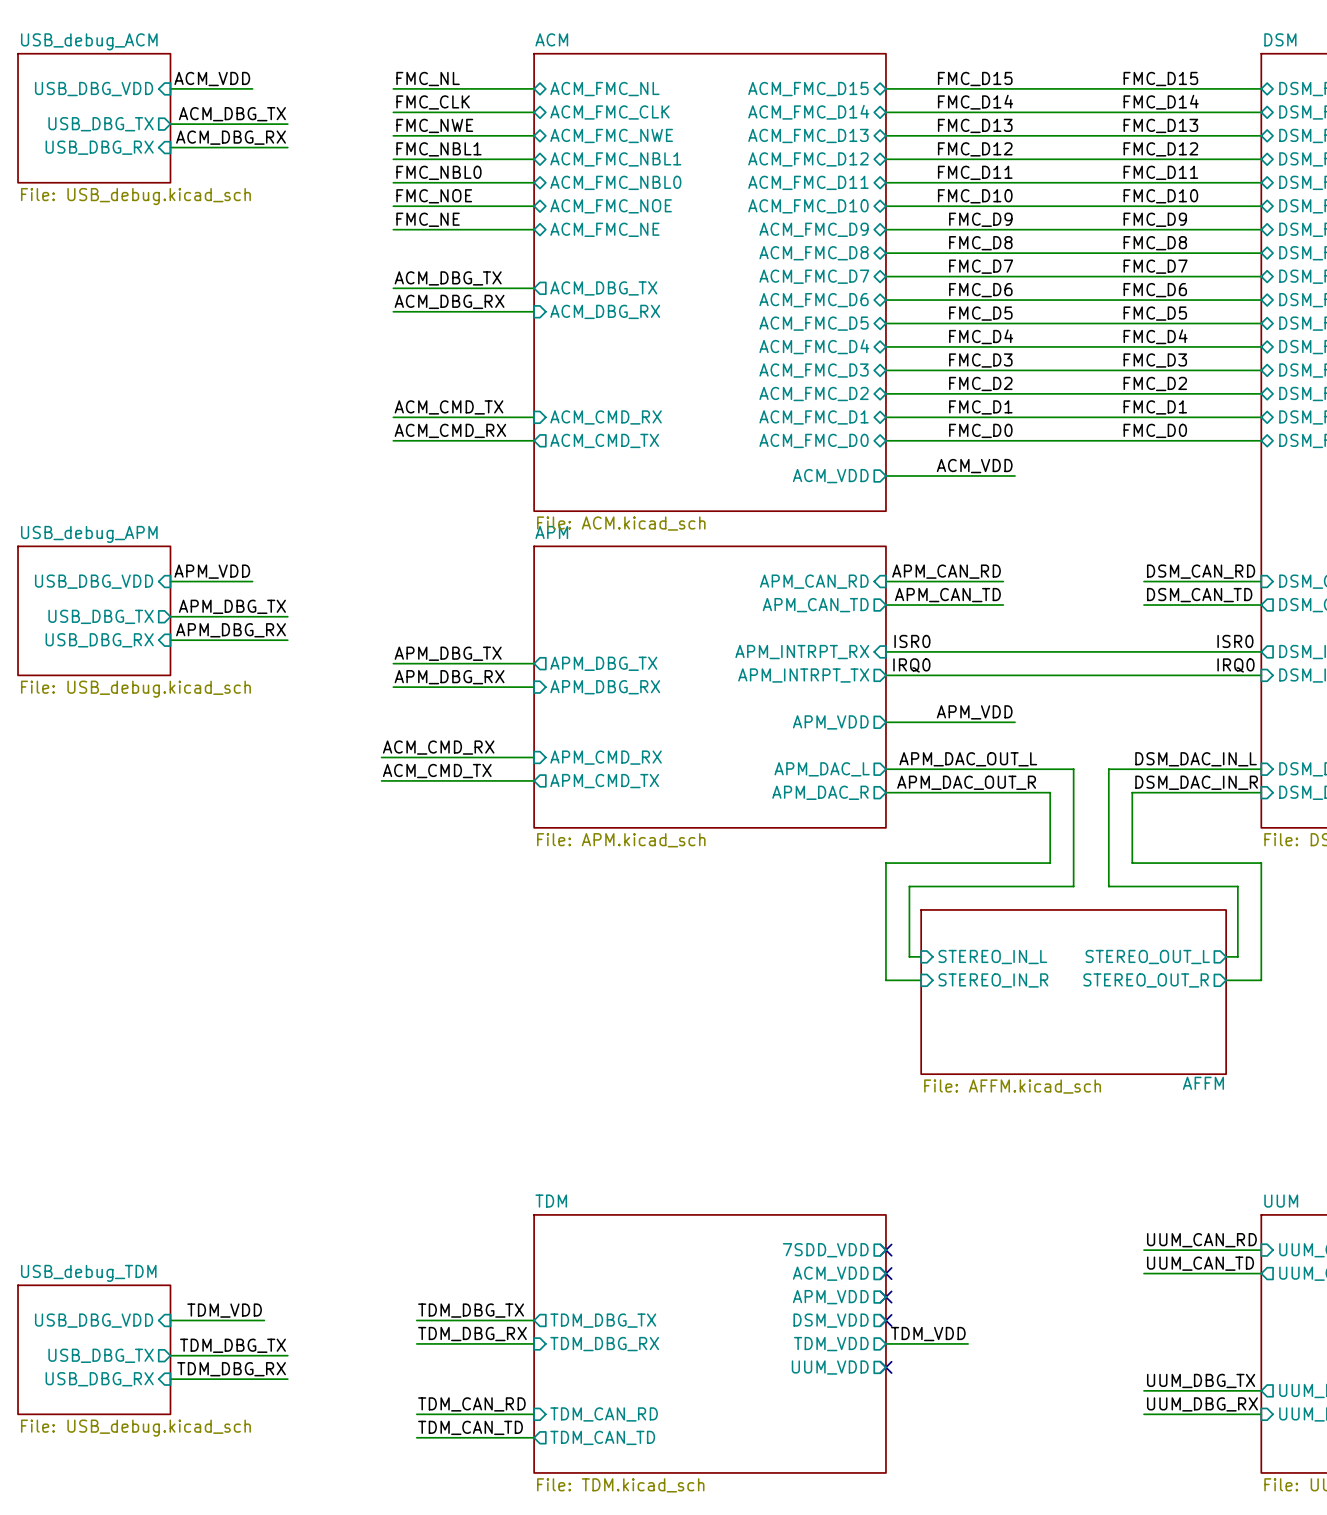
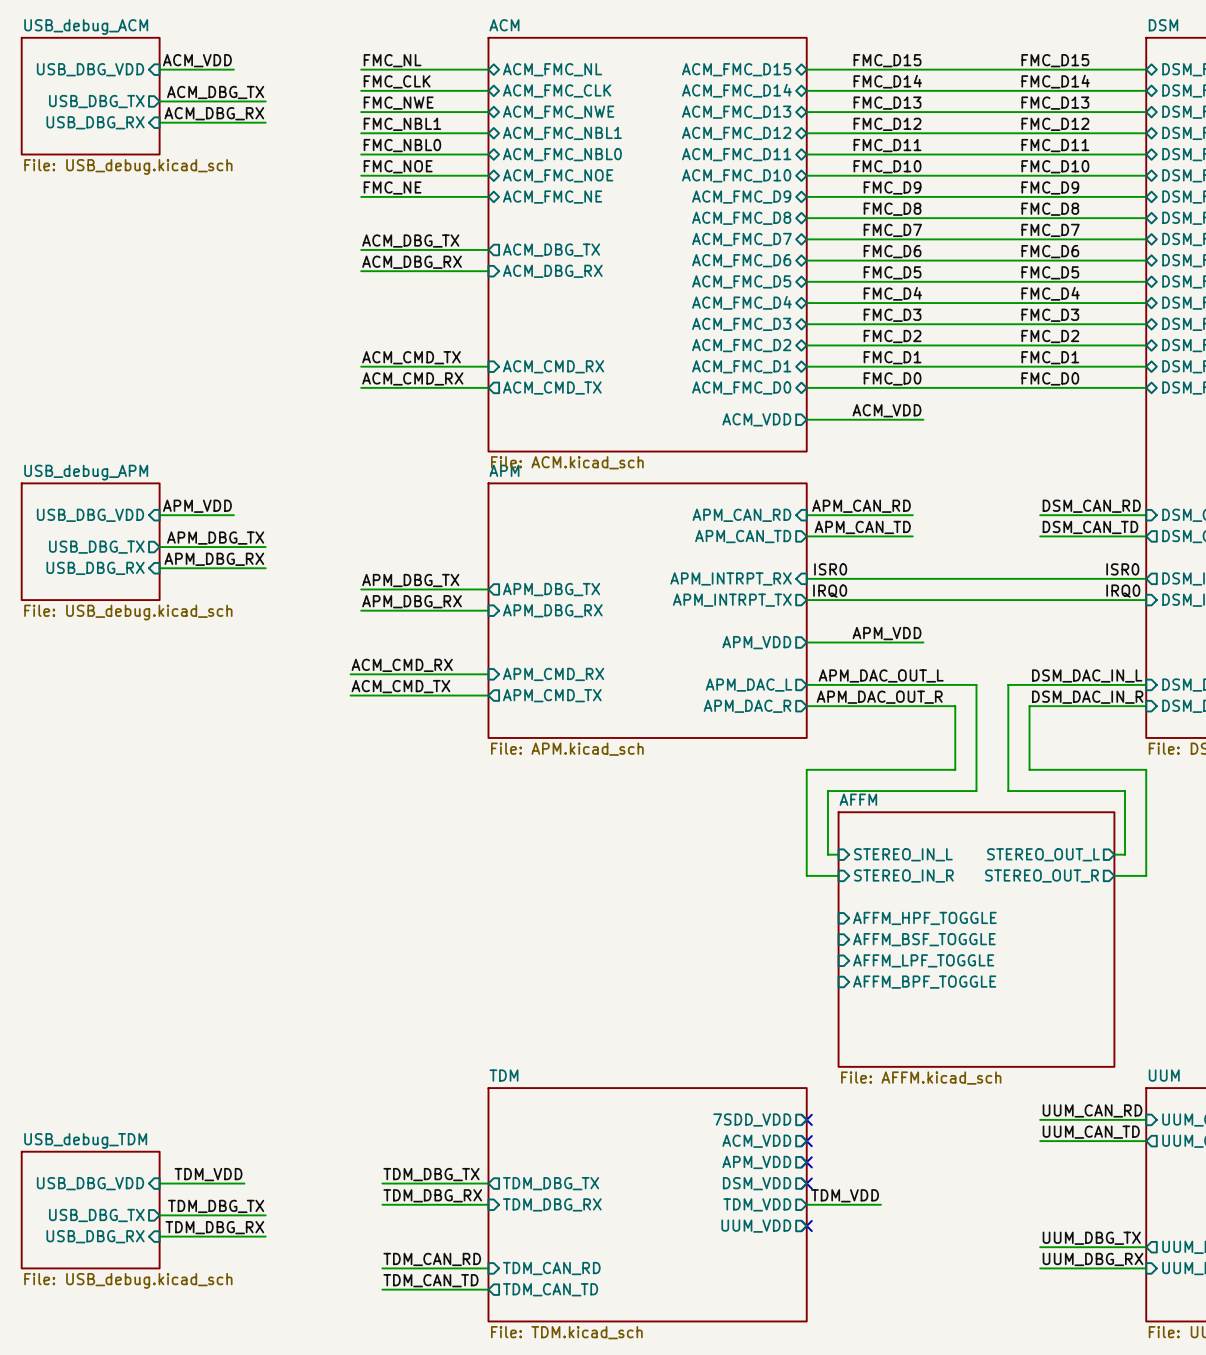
sheet AFFM: File: AFFM.kicad_sch (1073, 992) -> none
sheet pin: none -> AFFM_HPF_TOGGLE (924, 918)
sheet pin: none -> AFFM_BSF_TOGGLE (924, 939)
sheet AFFM: none -> File: AFFM.kicad_sch (976, 939)
sheet pin: none -> AFFM_LPF_TOGGLE (923, 960)
sheet pin: none -> AFFM_BPF_TOGGLE (924, 982)

